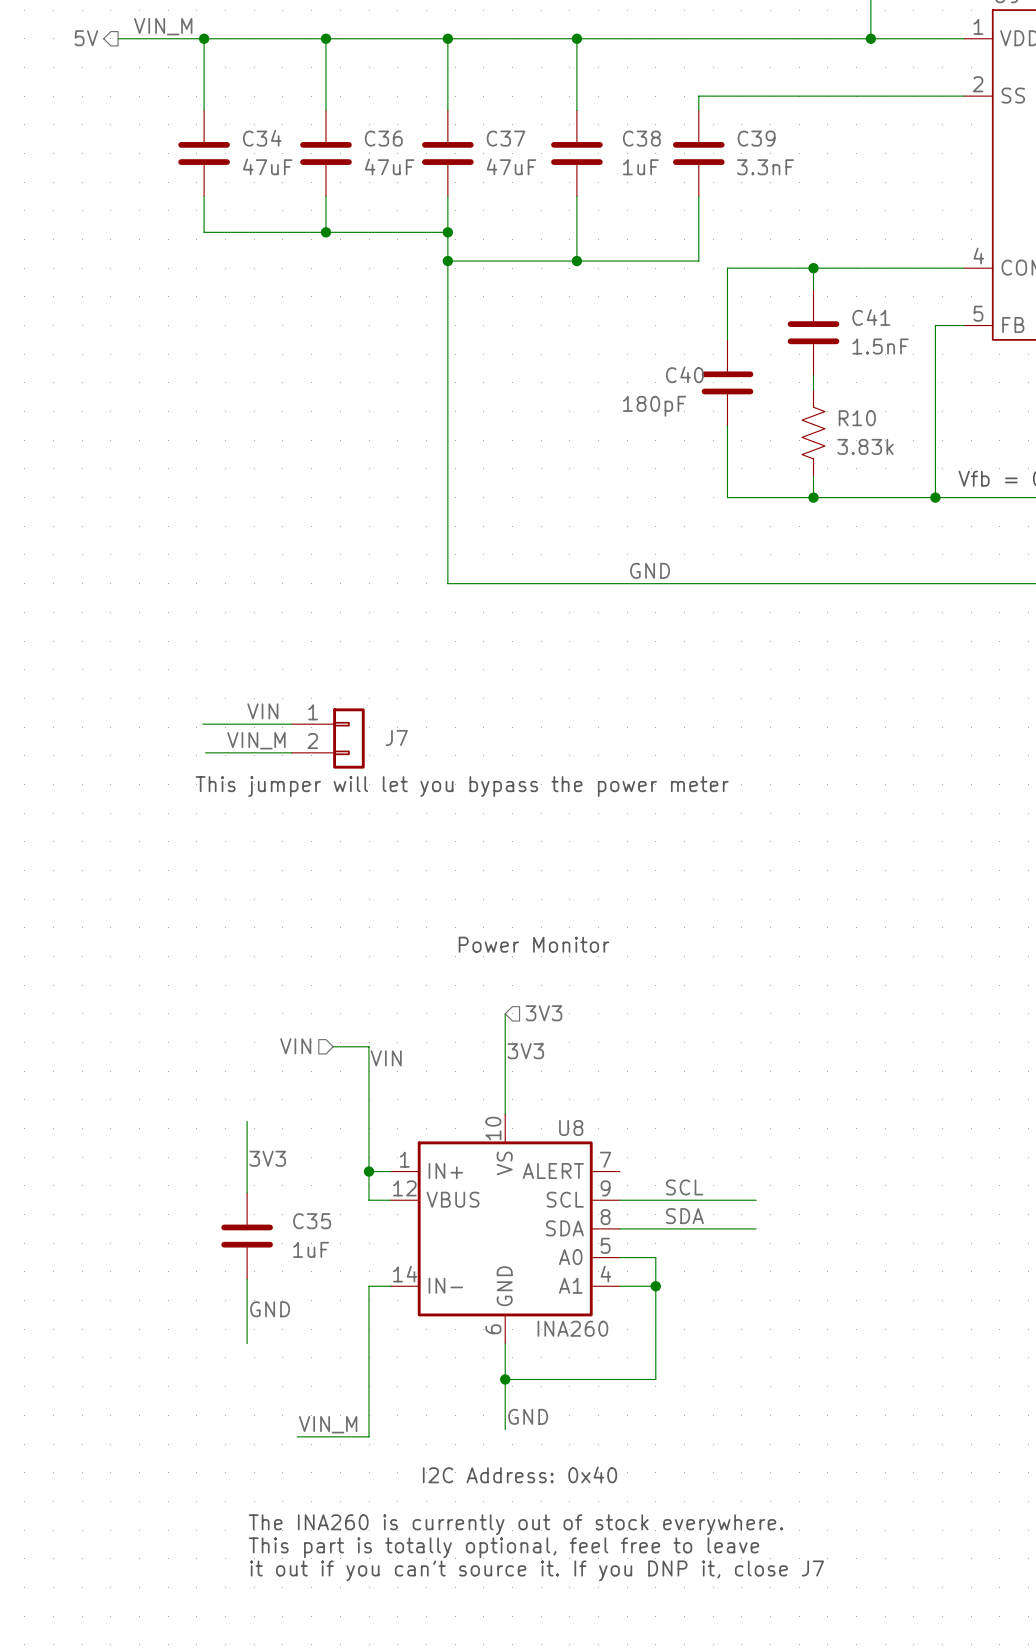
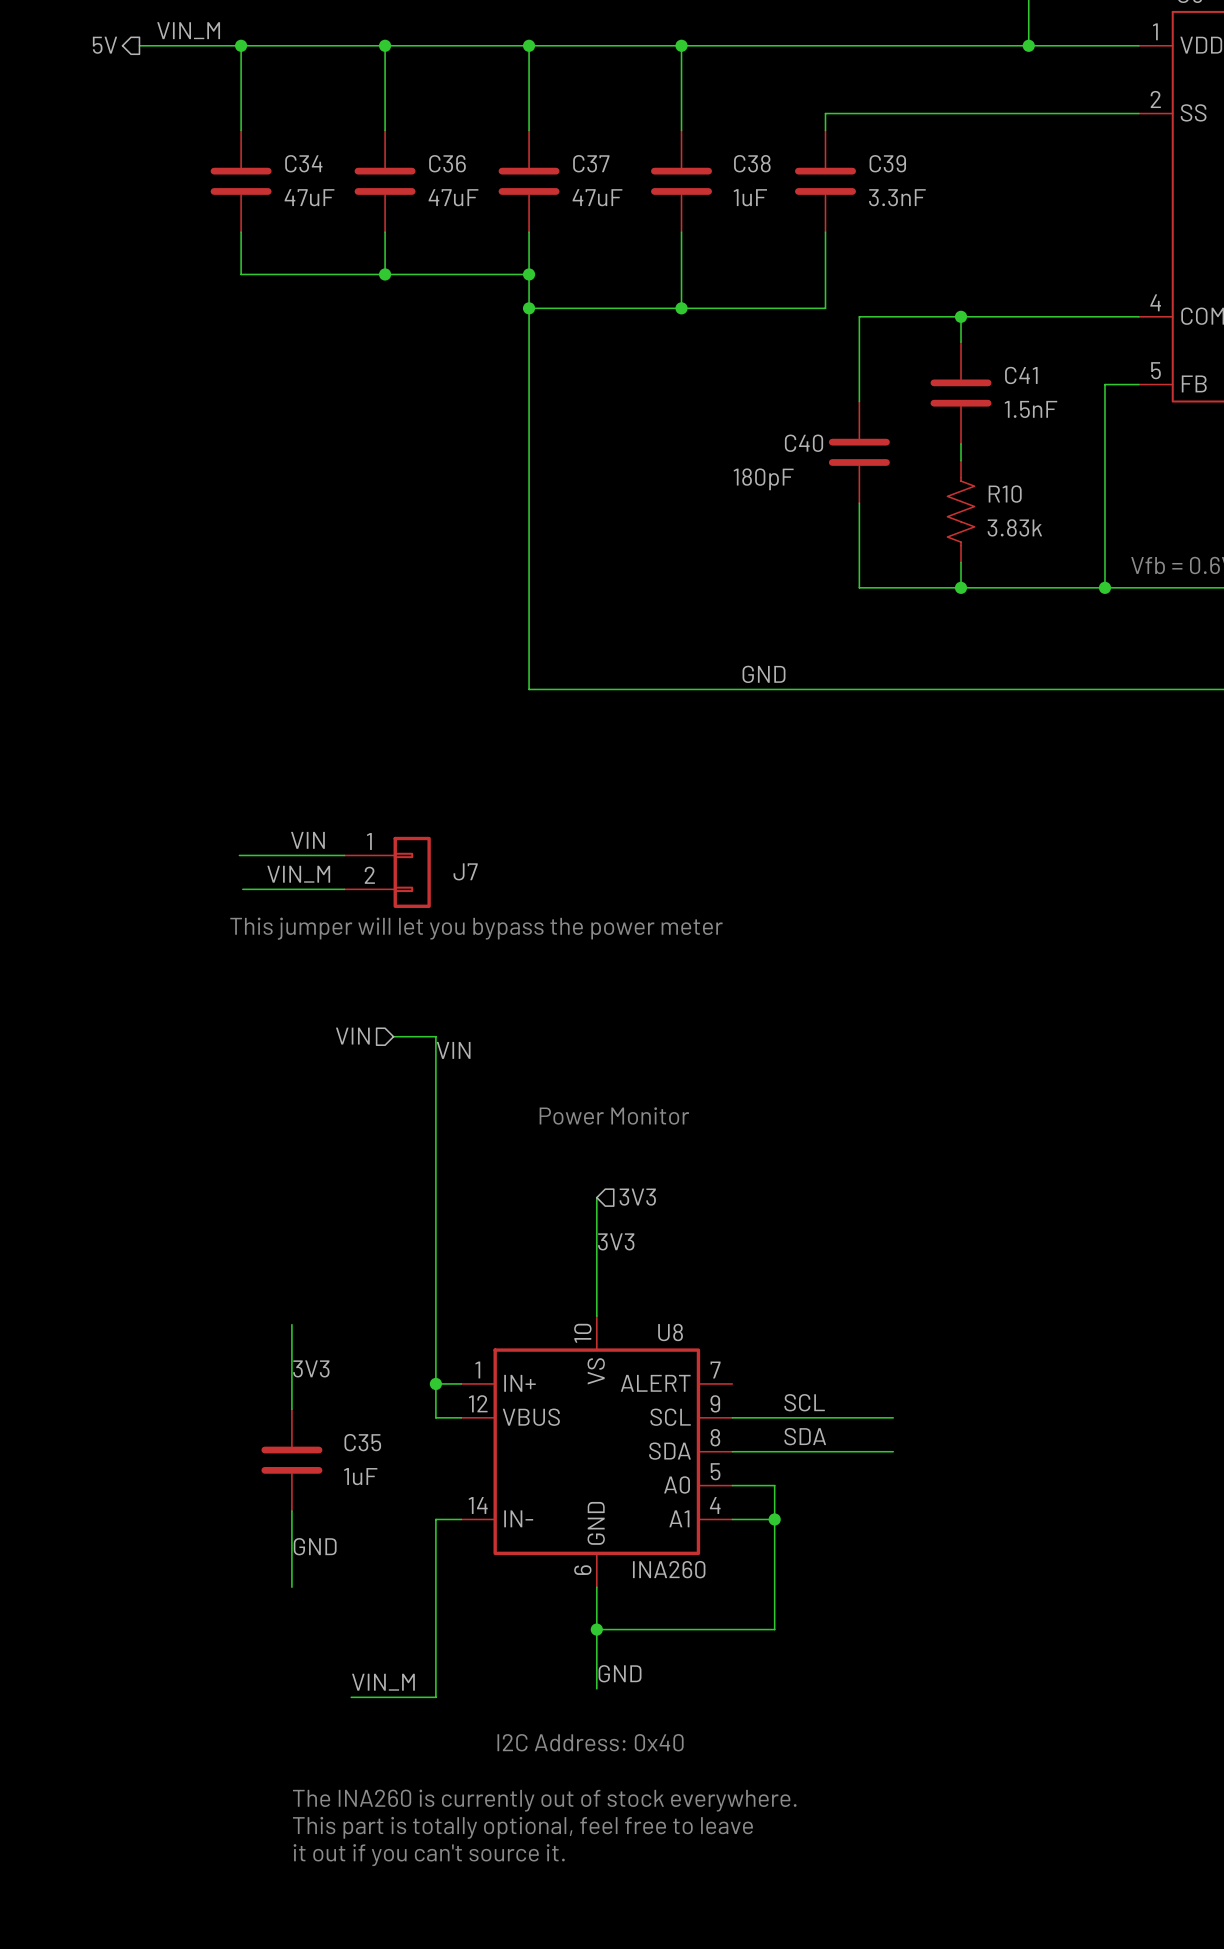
hierarchical label position: VIN (295, 1046) -> VIN (352, 1036)
wire: (333, 1046) (369, 1046) -> (393, 1036) (435, 1036) (435, 1236)
label position: VIN (386, 1058) -> VIN (453, 1050)
text: it out if you can't source it. If you DNP it, close J7 (537, 1570) -> it out if you can't source it. (429, 1855)

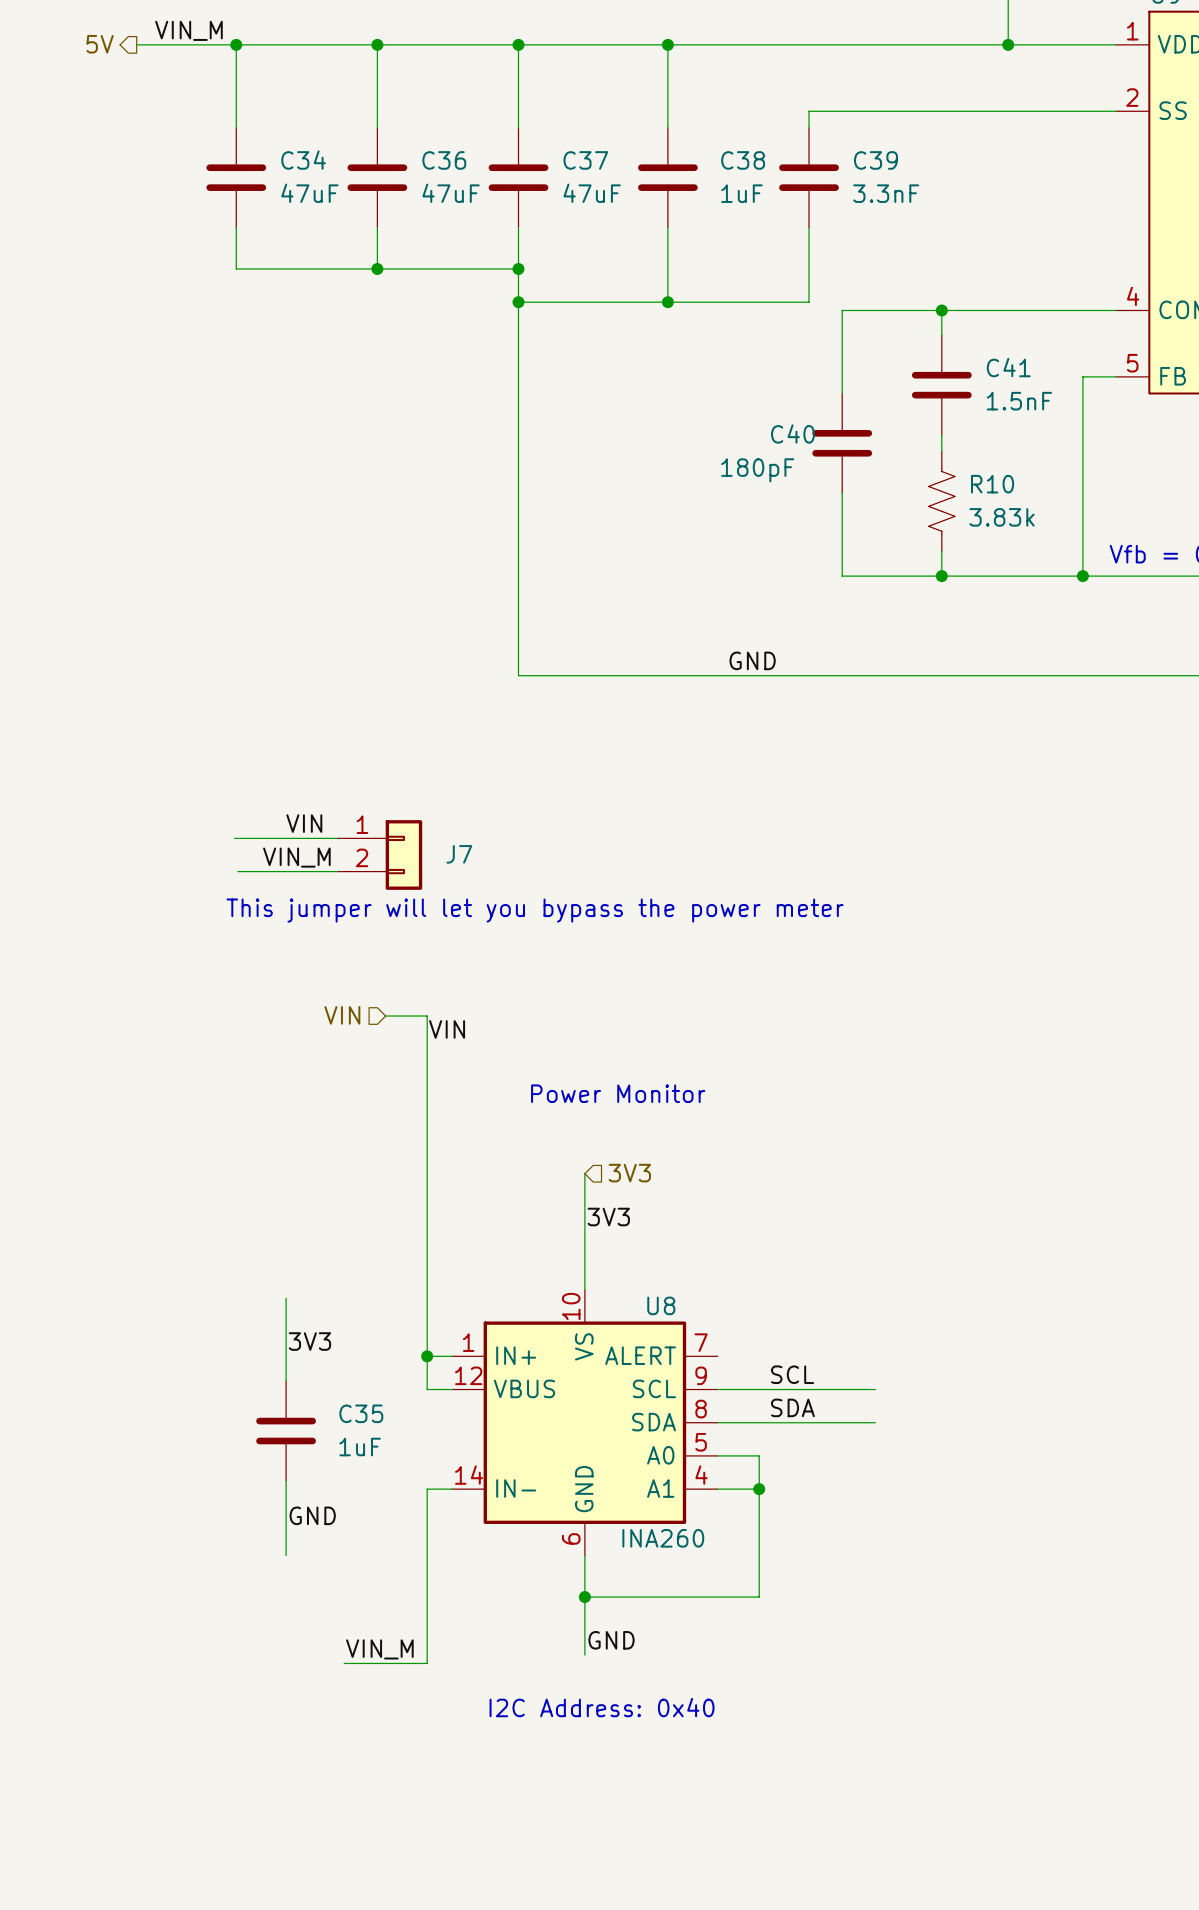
text: The INA260 is currently out of stock everywhere. (544, 1800) -> none
text: This part is totally optional, feel free to leave (522, 1827) -> none
text: it out if you can't source it. (429, 1855) -> none

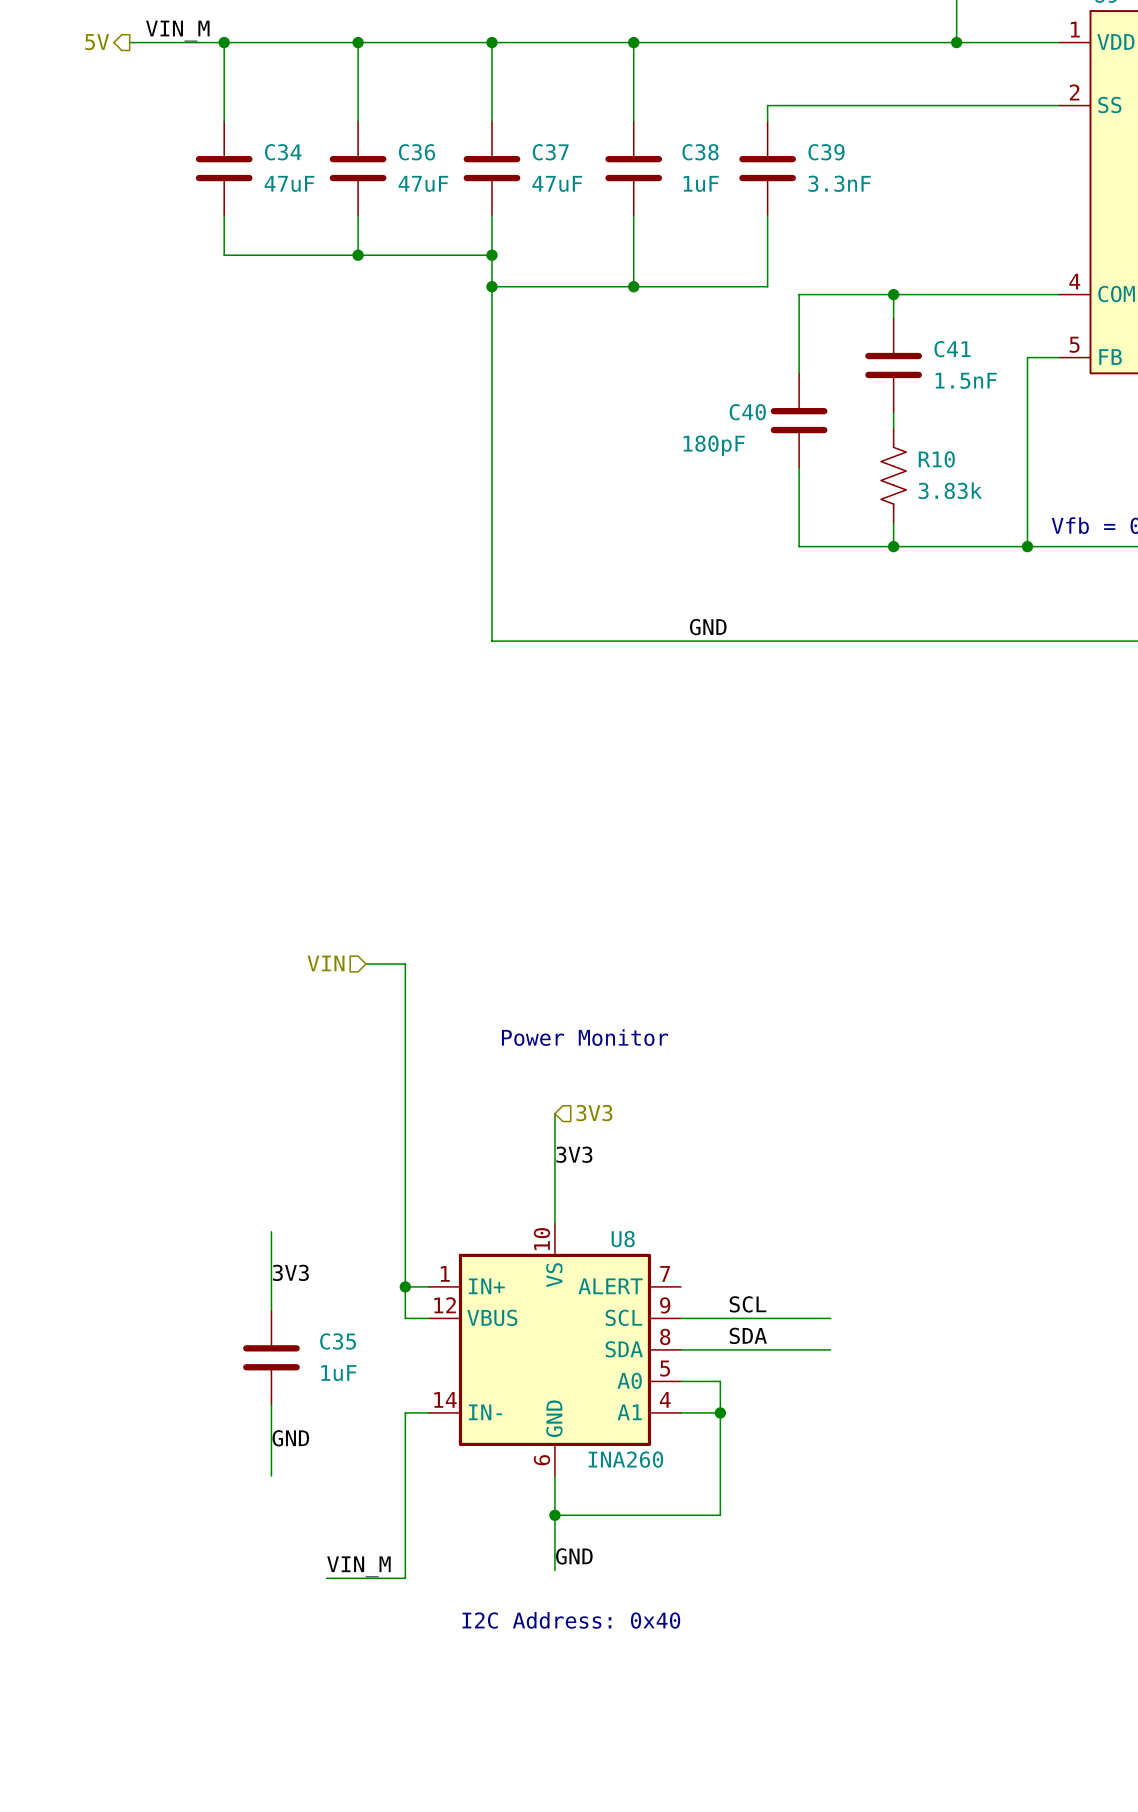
label: VIN (304, 823) -> none
wire: (234, 838) (337, 838) -> none
J7: (379, 854) -> none
label: VIN_M (296, 857) -> none
wire: (237, 871) (337, 871) -> none
text: This jumper will let you bypass the power meter (535, 910) -> none
label: VIN (447, 1029) -> none

